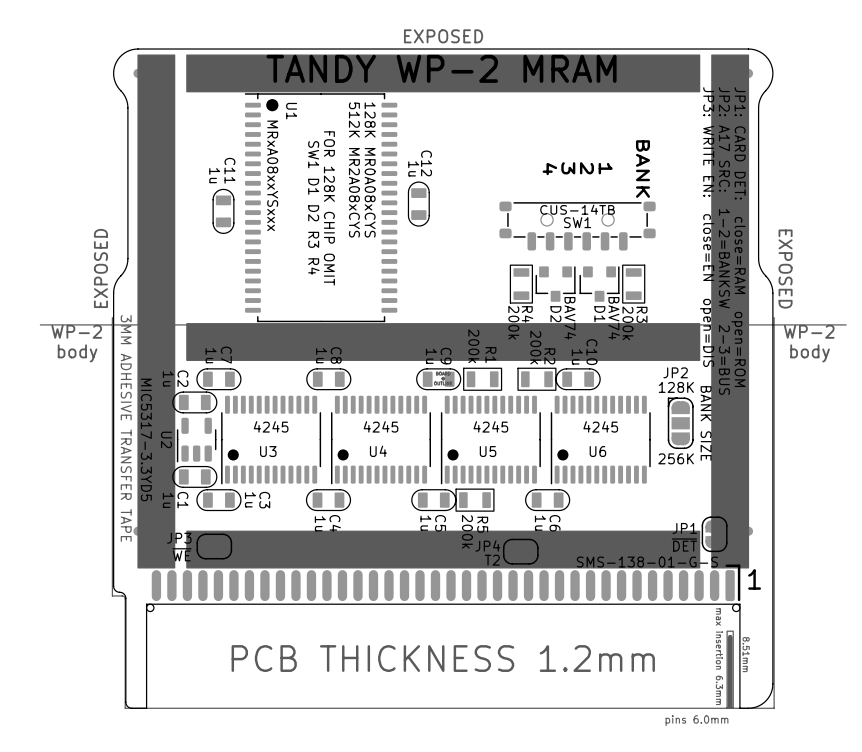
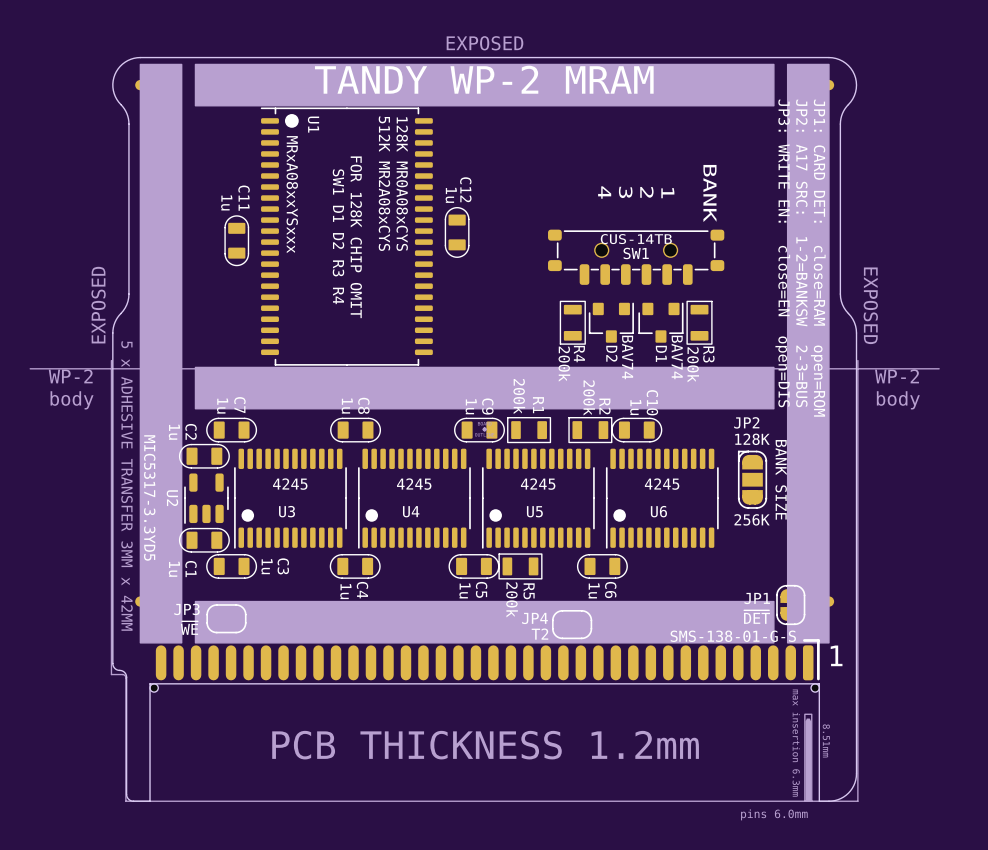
text: 3MM ADHESIVE TRANSFER TAPE (126, 428) -> 5 x ADHESIVE TRANSFER 3MM x 42MM (127, 486)

